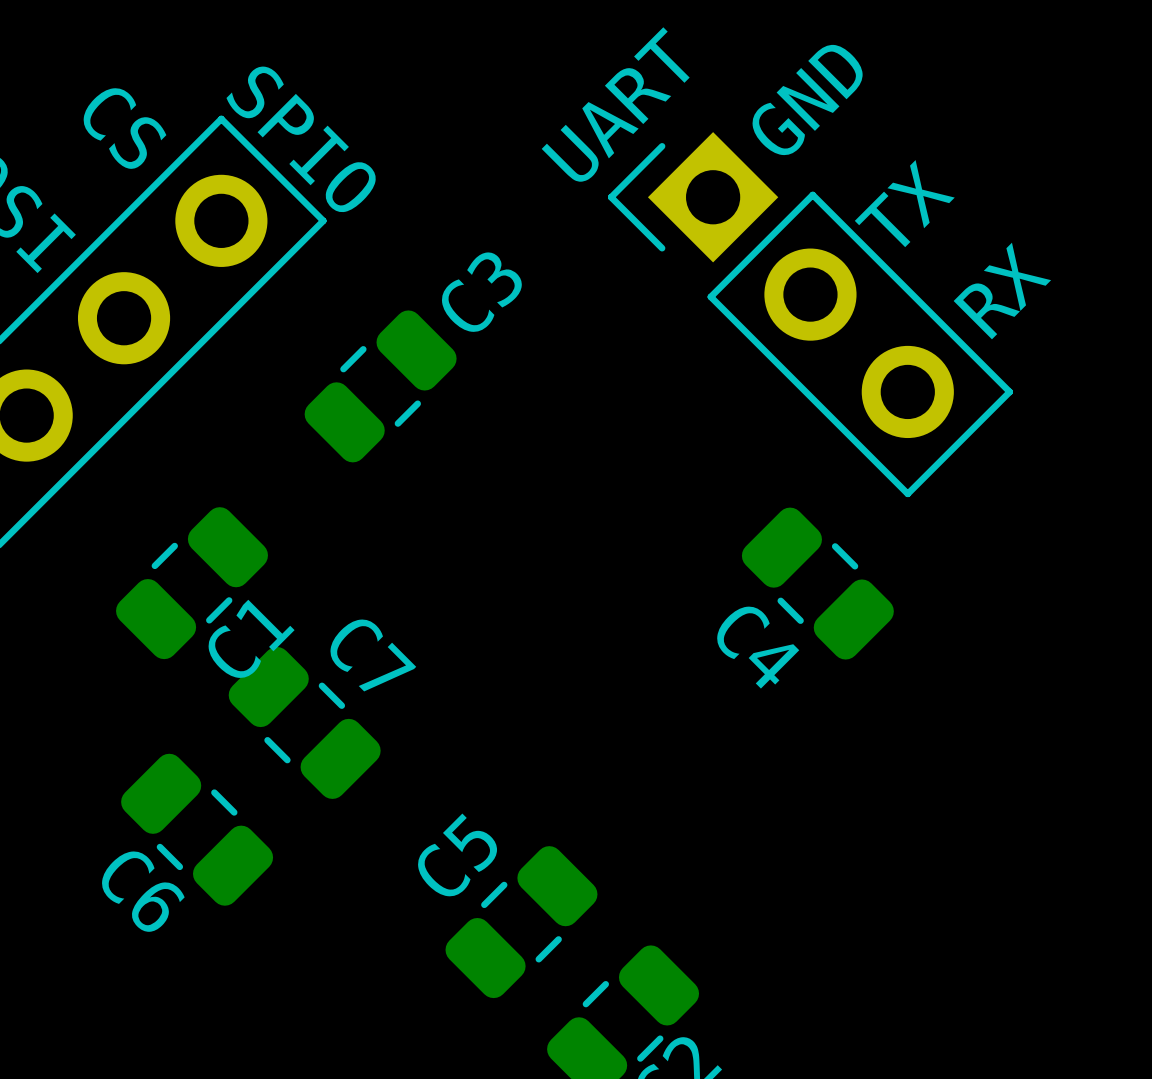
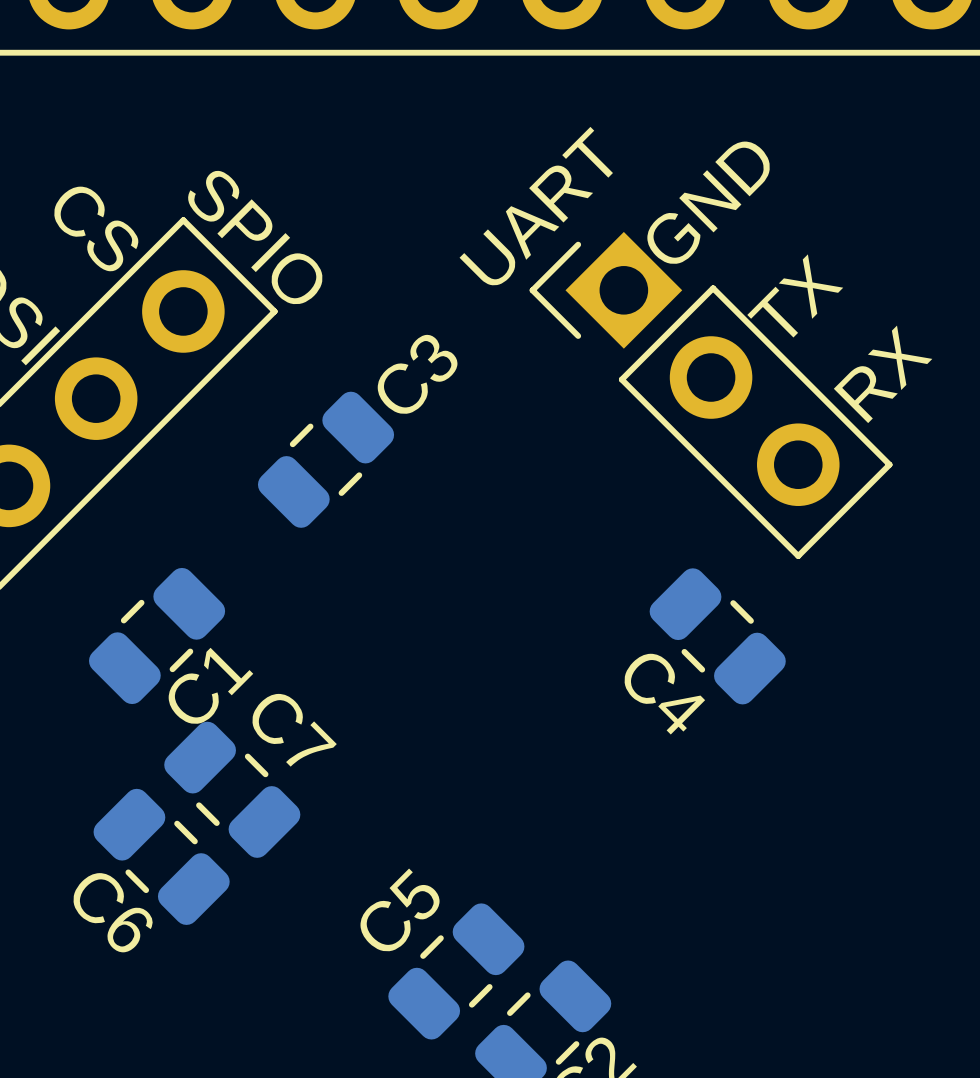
C7 position: (304, 722) -> (232, 789)
C5 position: (521, 922) -> (456, 971)

